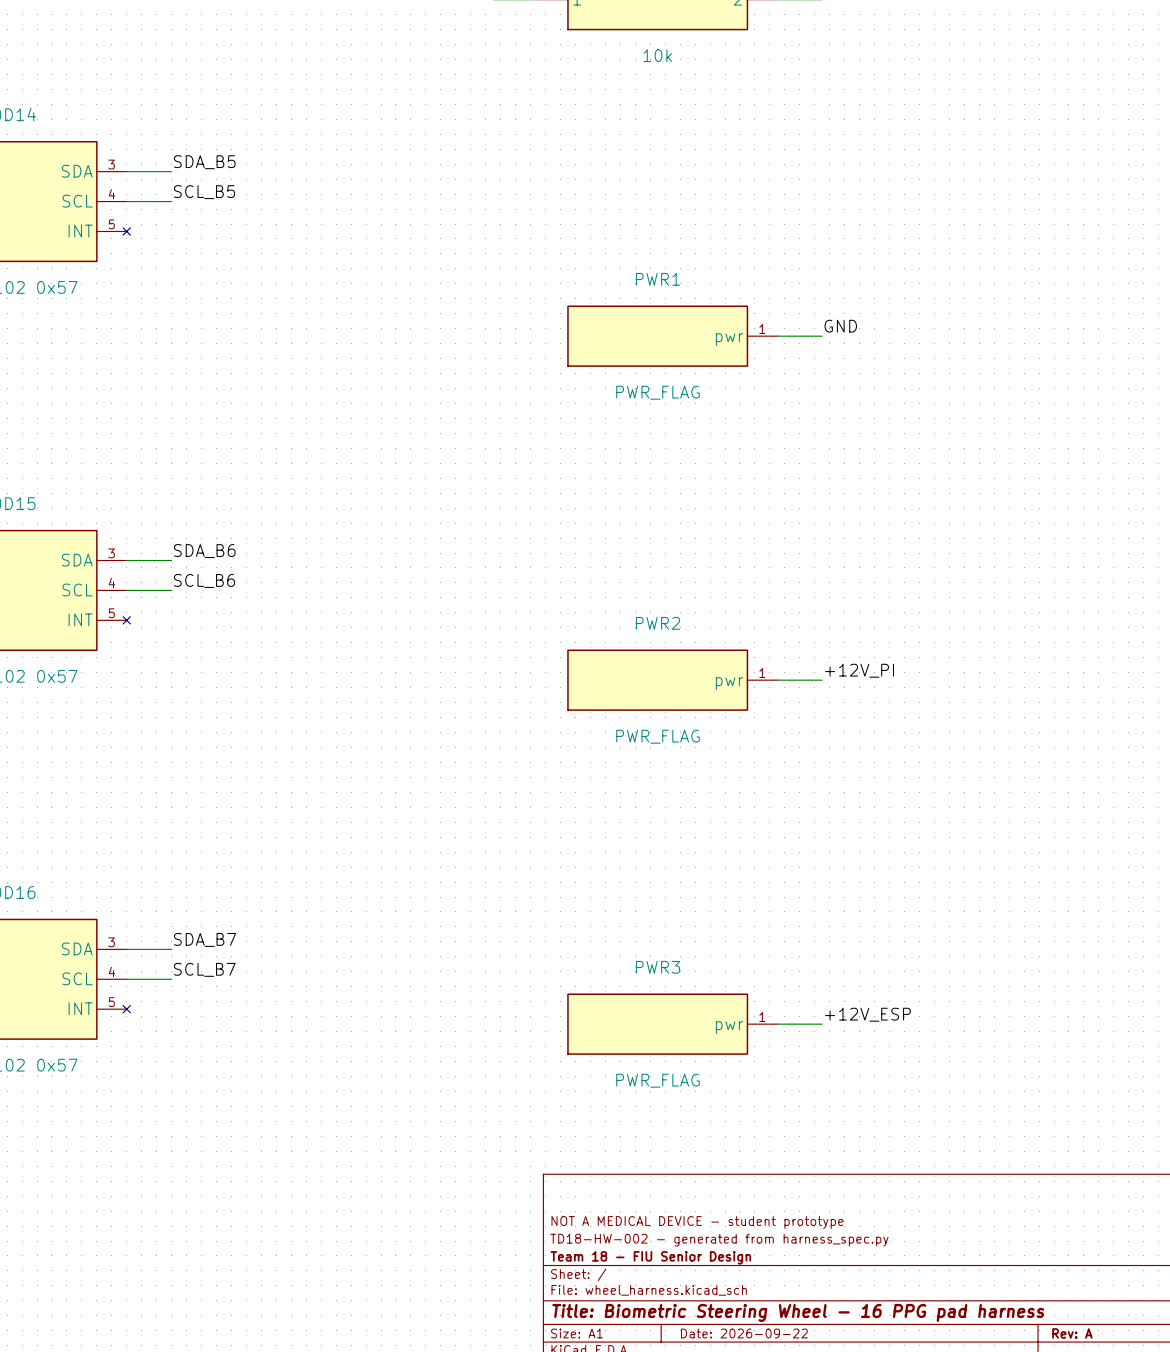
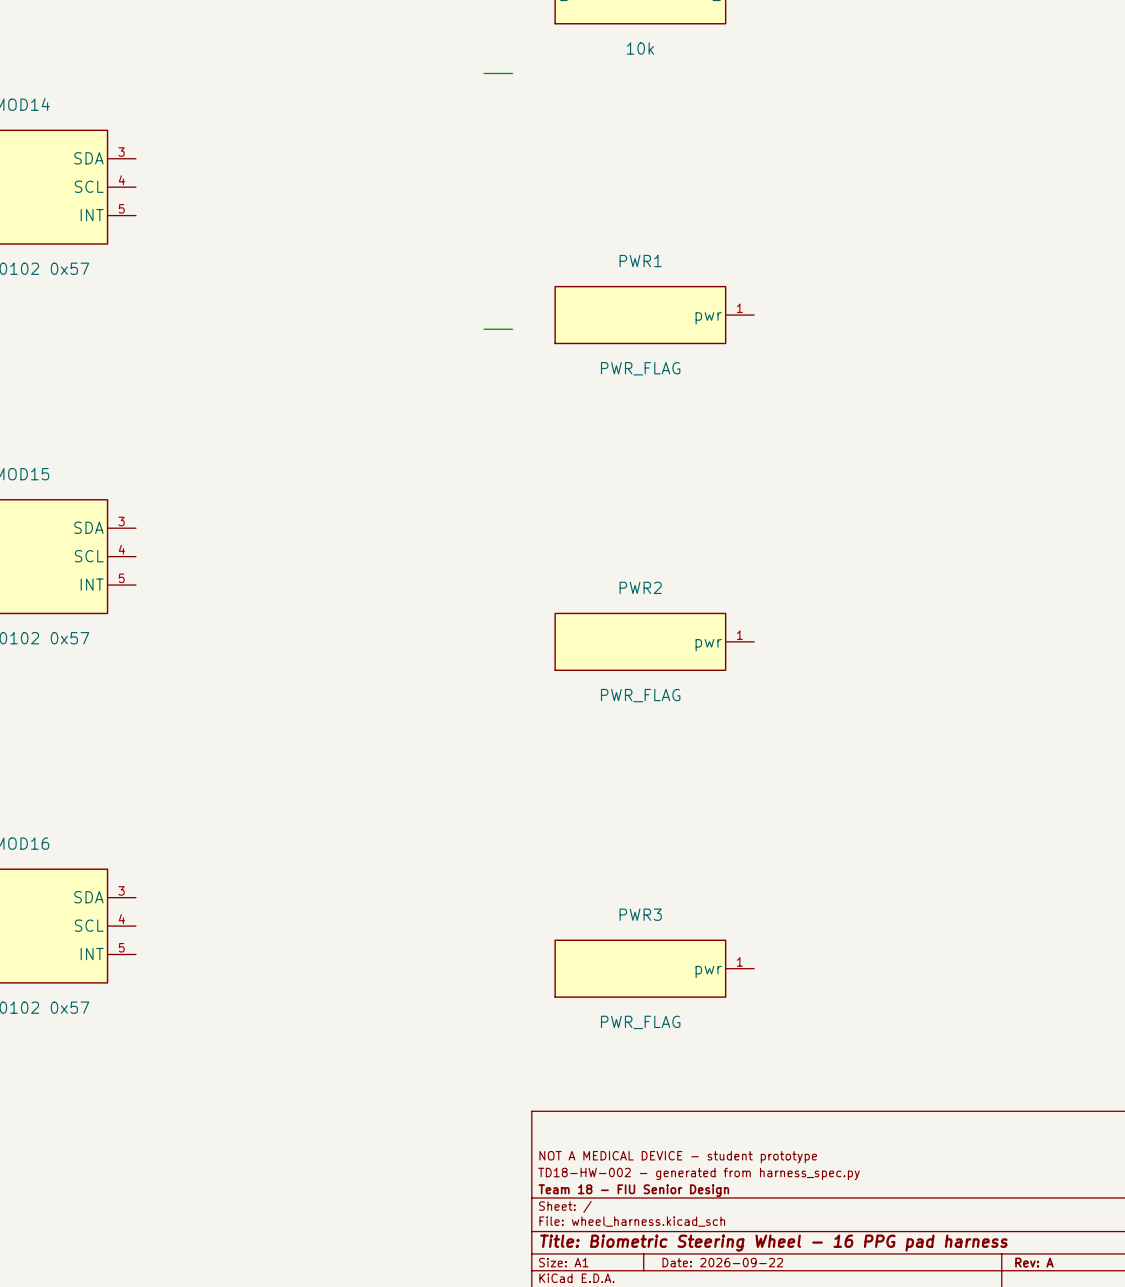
wire: none -> (484, 73) (512, 73)
label: SDA_B5 (204, 162) -> none
wire: (126, 171) (171, 171) -> none
label: SCL_B5 (204, 192) -> none
wire: (126, 201) (171, 201) -> none
no-connect mark: (126, 231) -> none
label: GND (840, 326) -> none
wire: (777, 336) (822, 336) -> none
wire: none -> (484, 329) (512, 329)
label: SDA_B6 (204, 551) -> none
wire: (126, 560) (171, 560) -> none
label: SCL_B6 (204, 580) -> none
wire: (126, 590) (171, 590) -> none
no-connect mark: (126, 620) -> none
label: +12V_PI (859, 670) -> none
wire: (777, 680) (822, 680) -> none
label: SDA_B7 (205, 939) -> none
wire: (126, 949) (171, 949) -> none
label: SCL_B7 (204, 969) -> none
wire: (126, 979) (171, 979) -> none
no-connect mark: (126, 1009) -> none
label: +12V_ESP (867, 1014) -> none
wire: (777, 1024) (822, 1024) -> none

